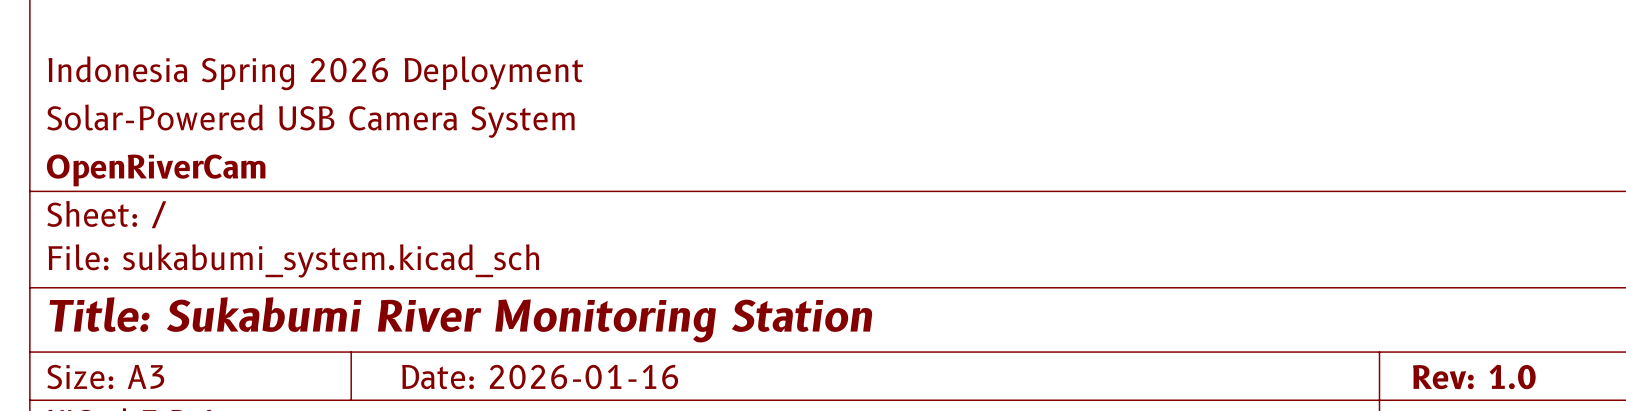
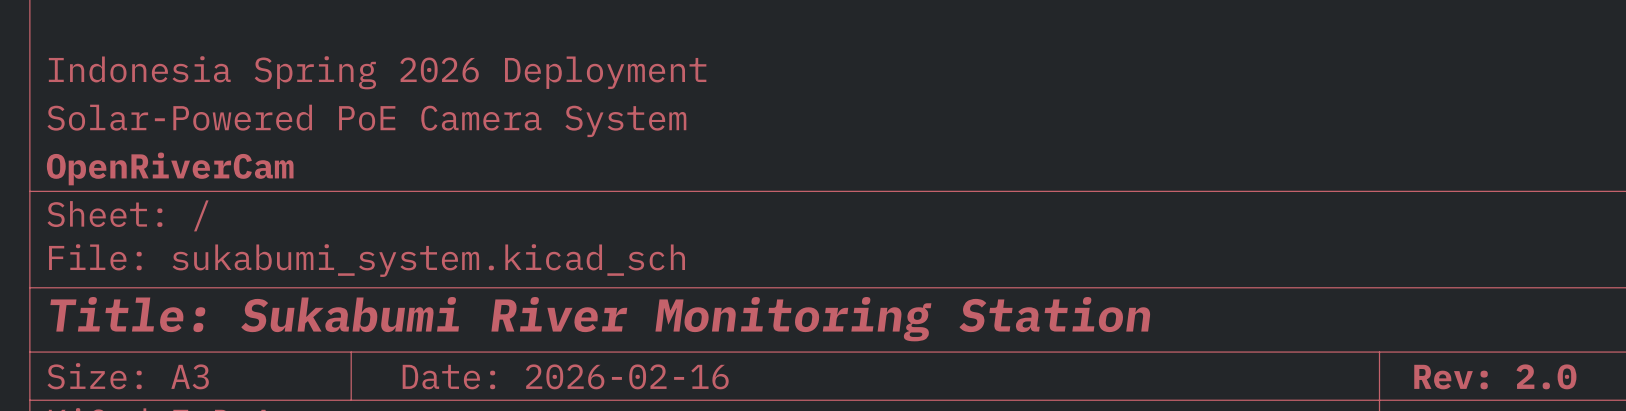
title block: Solar-Powered USB Camera System (310, 121) -> Solar-Powered PoE Camera System (366, 120)
title block: Date: 2026-01-16 (540, 376) -> Date: 2026-02-16 (565, 376)
title block: Rev: 1.0 (1474, 377) -> Rev: 2.0 (1495, 376)

